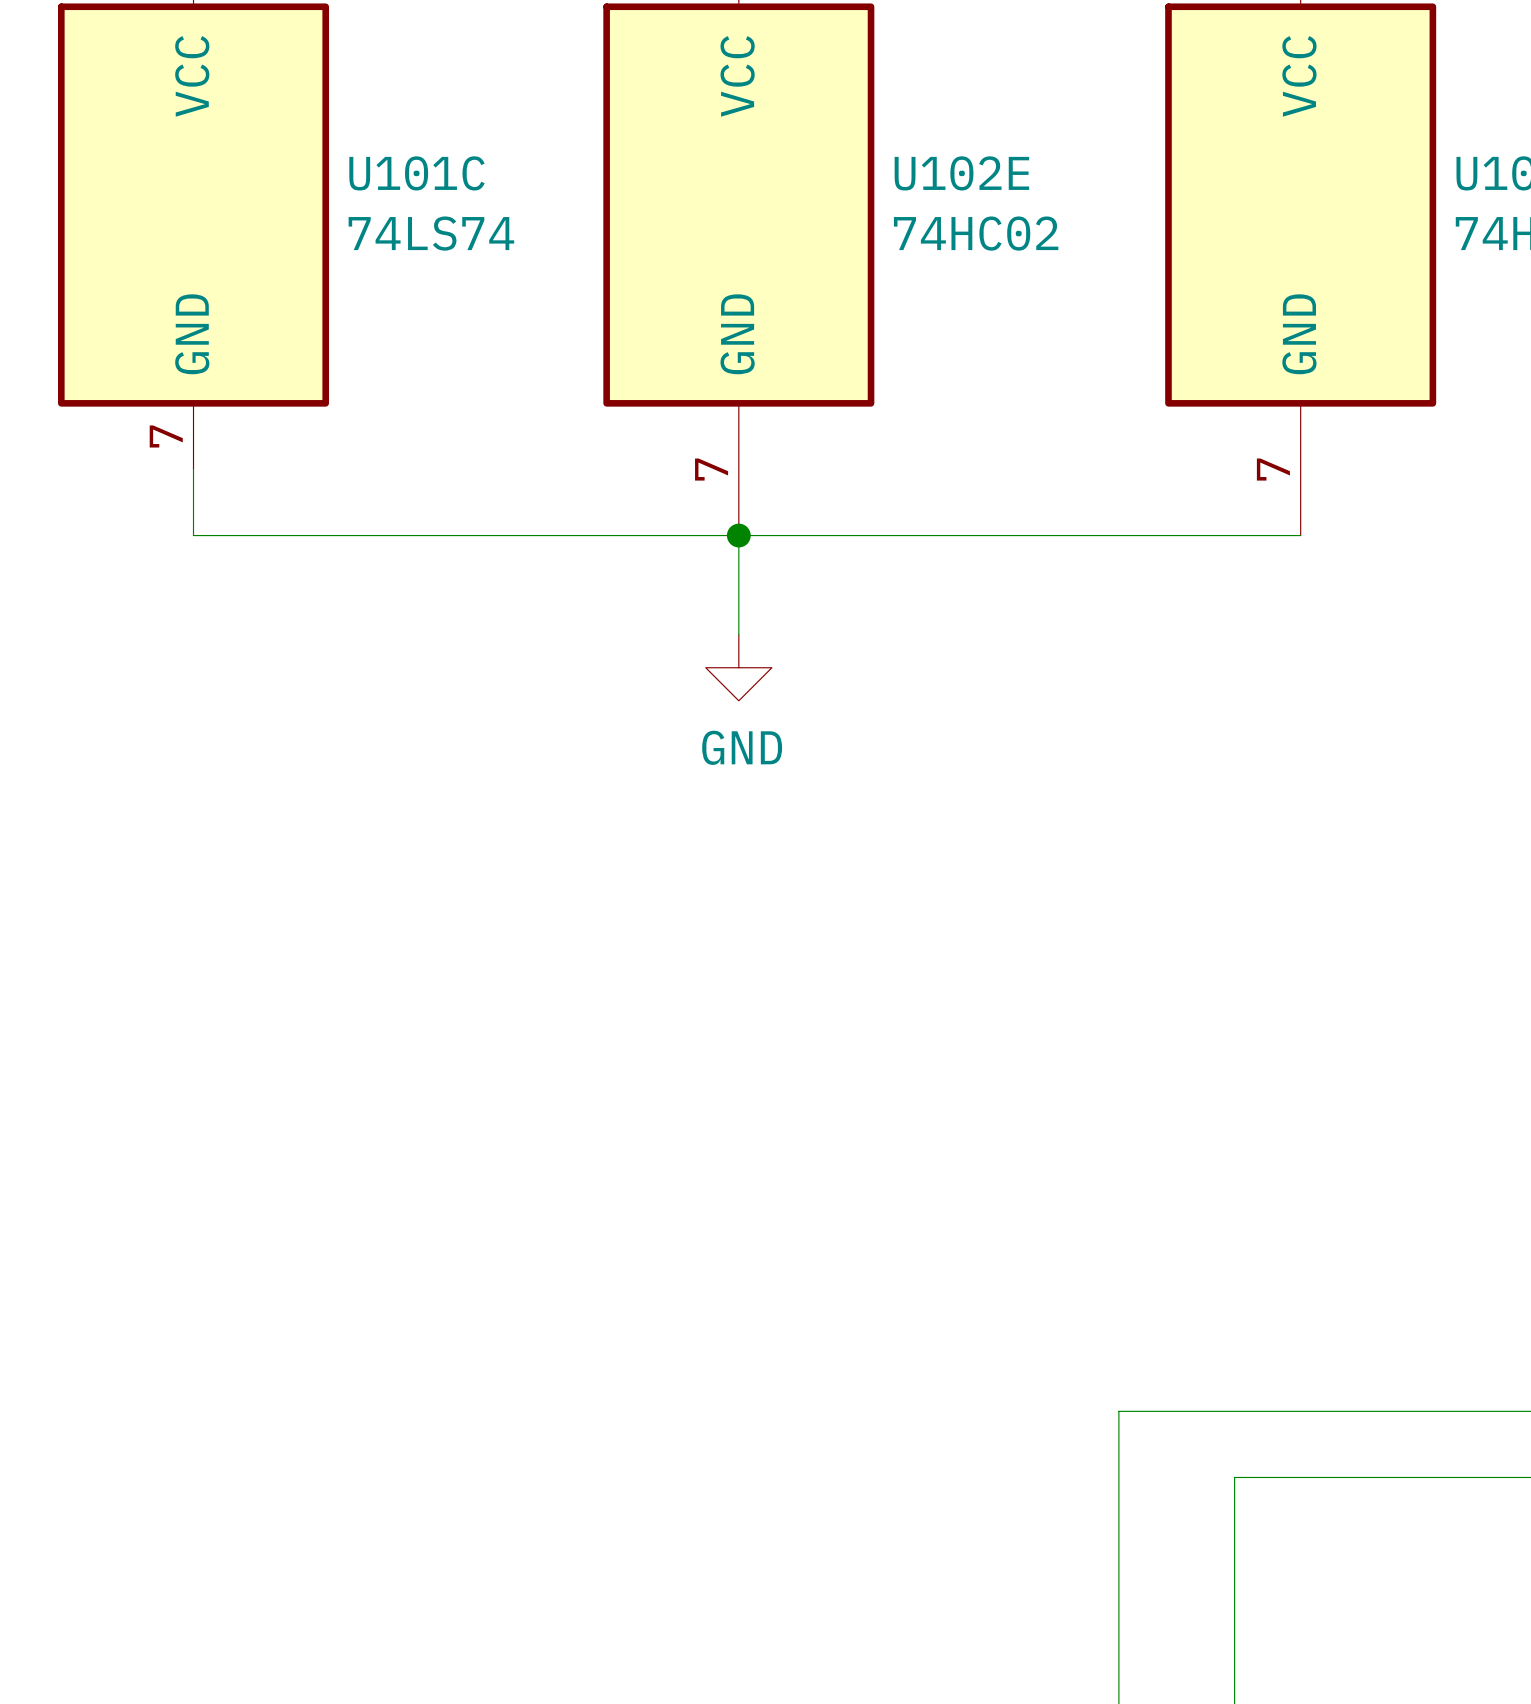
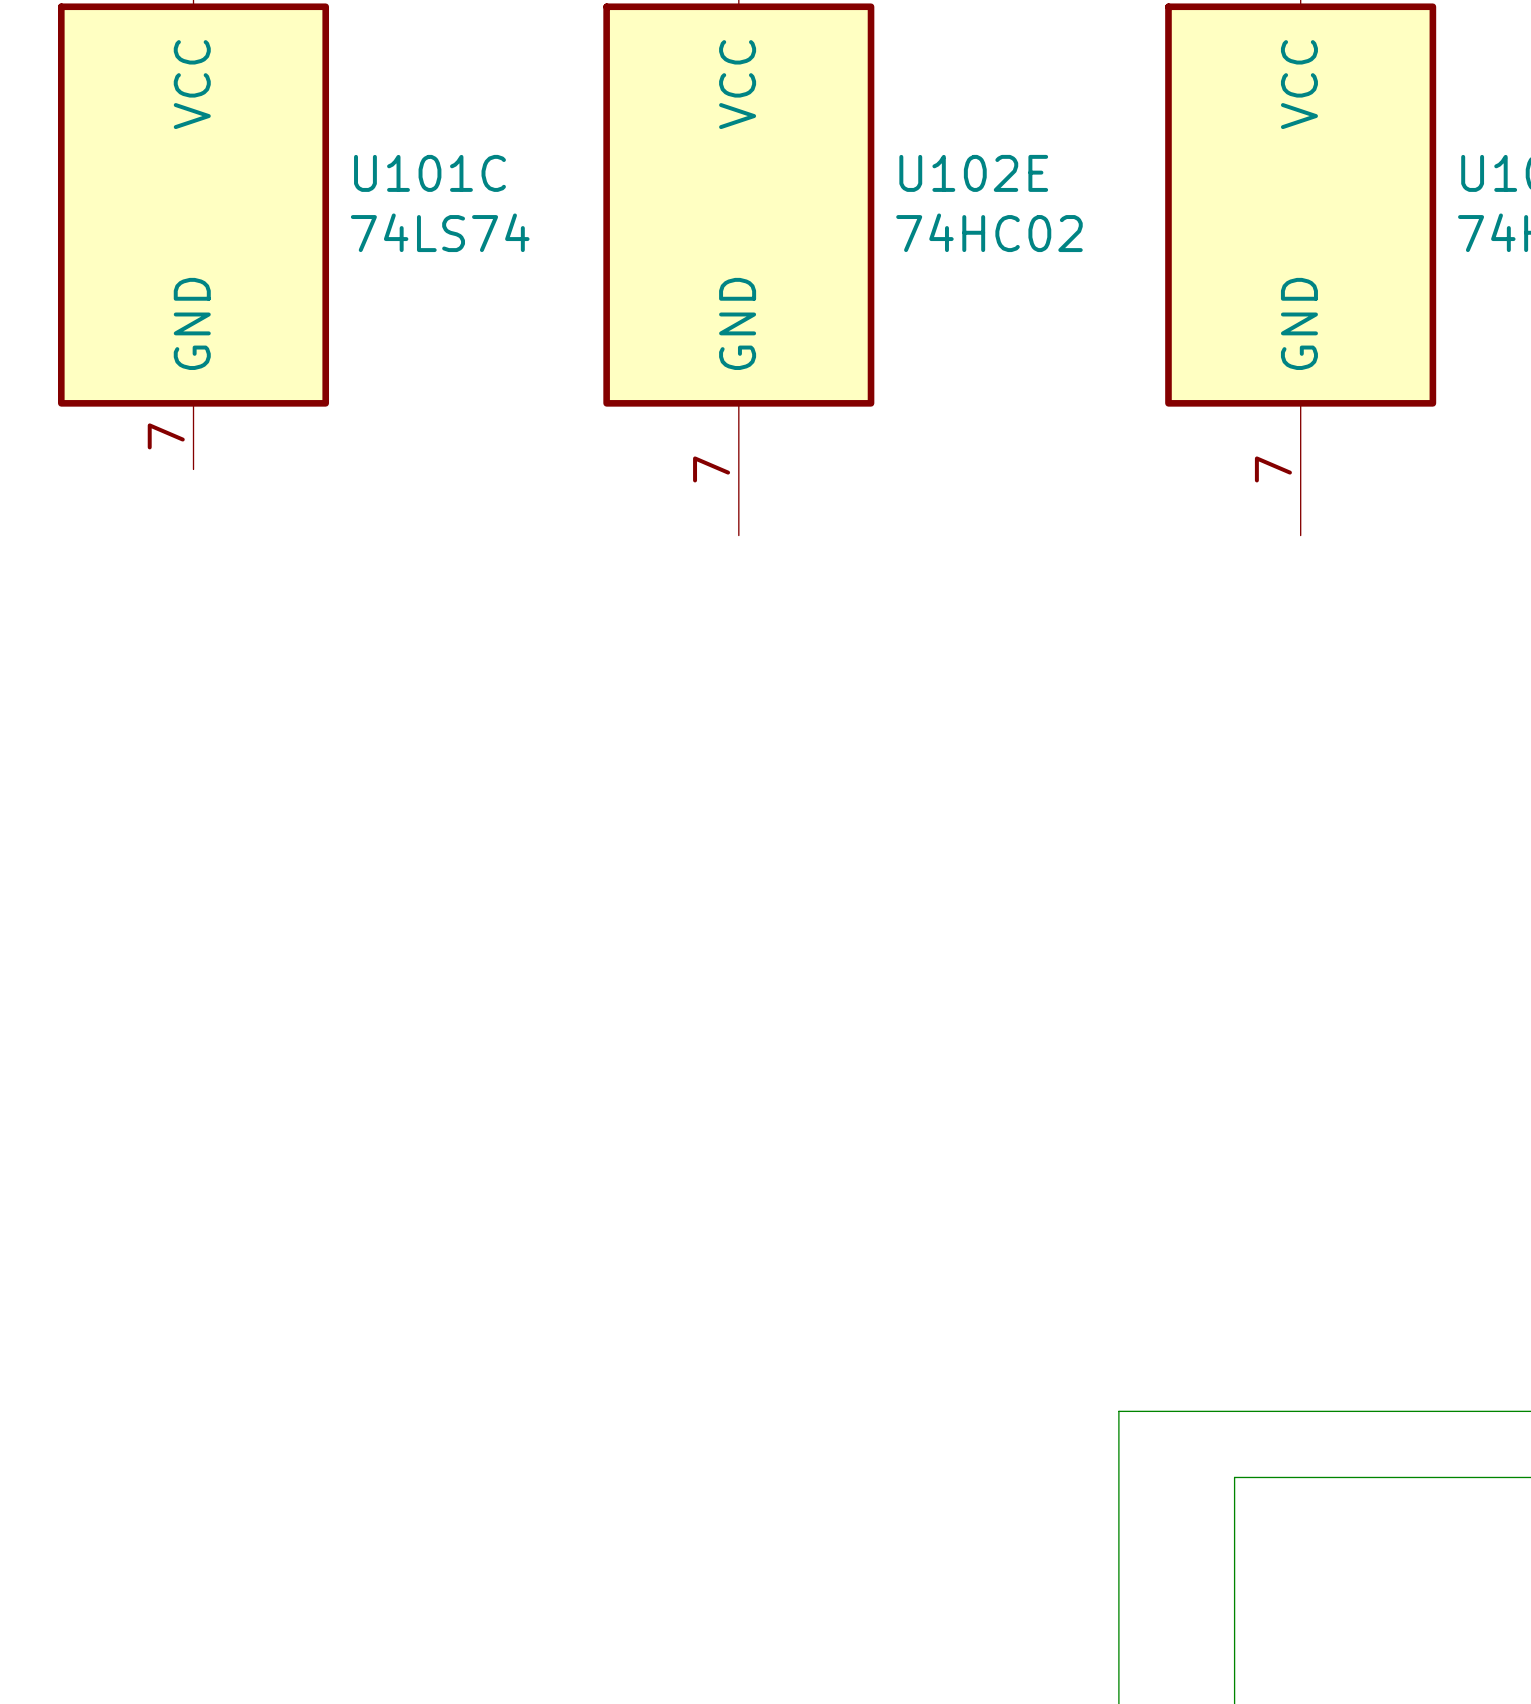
wire: (193, 469) (193, 535) (1300, 535) -> none
wire: (738, 535) (738, 634) -> none
junction: (738, 535) -> none
power symbol: GND (738, 667) -> none

